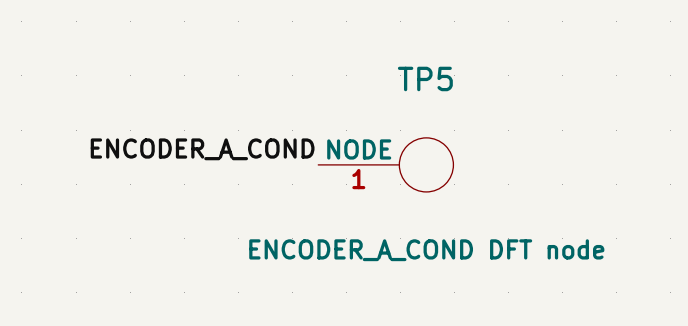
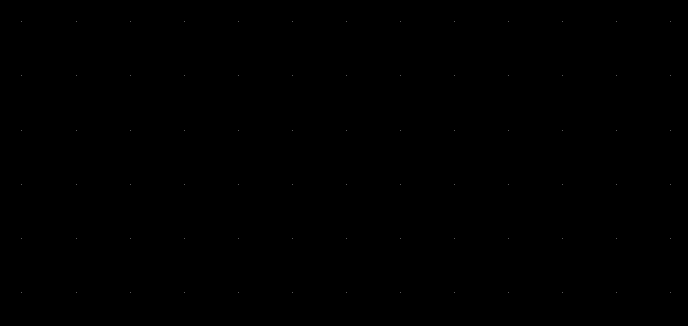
label: ENCODER_A_COND (202, 149) -> none
TP5: ENCODER_A_COND DFT node (385, 164) -> none

